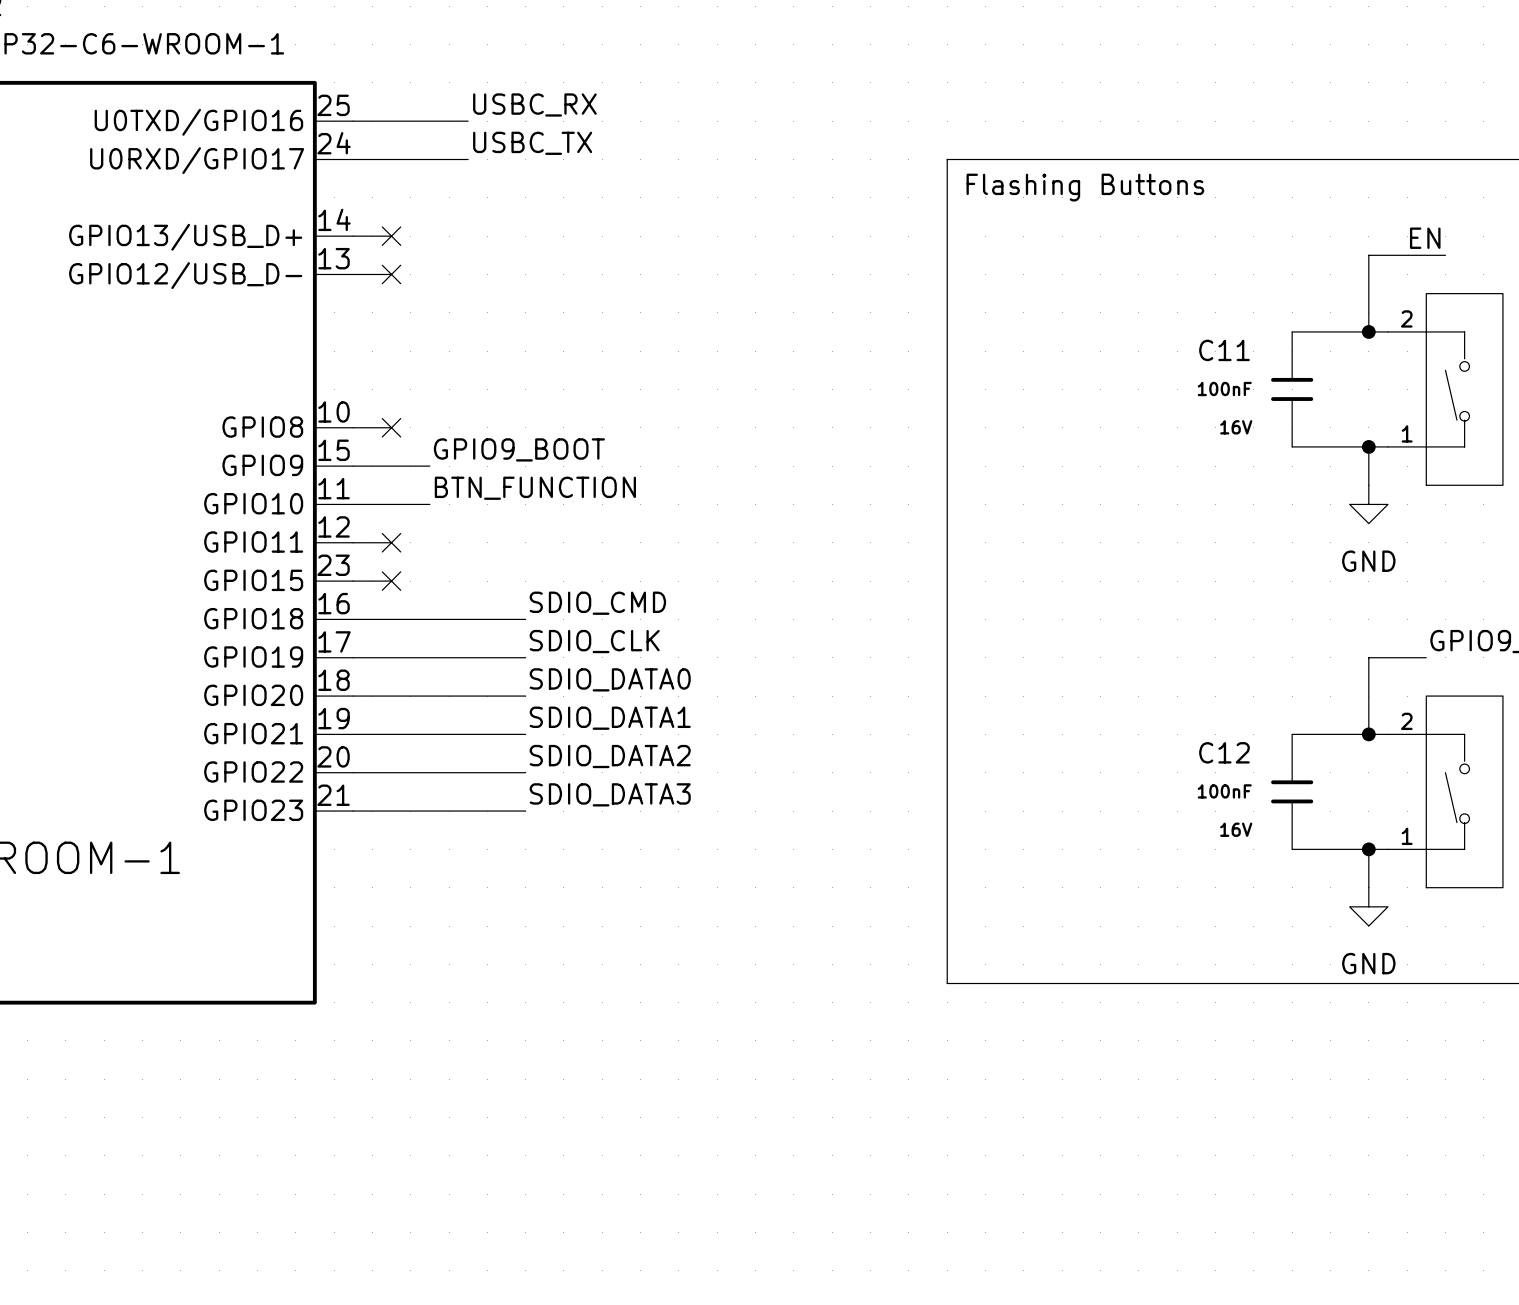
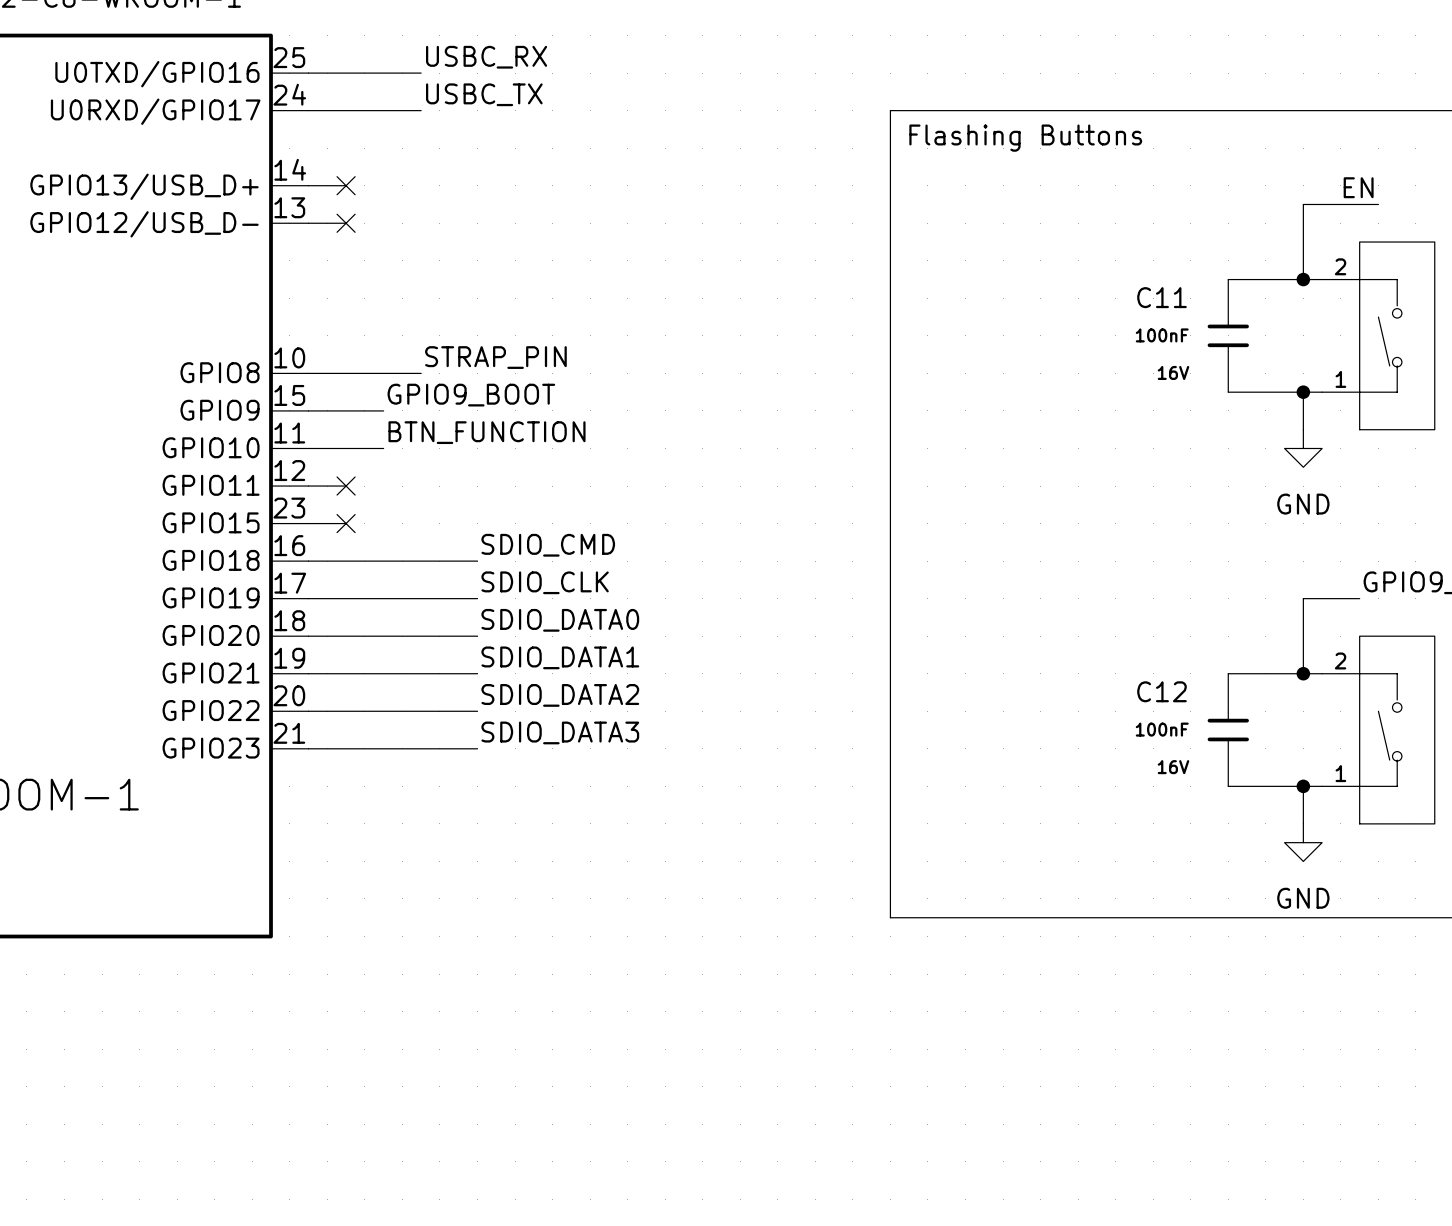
label: none -> STRAP_PIN (495, 357)
wire: none -> (346, 373) (421, 373)
no-connect mark: (391, 427) -> none

